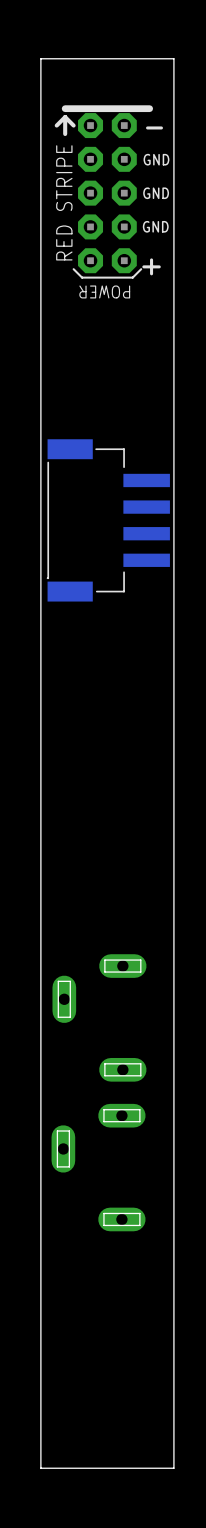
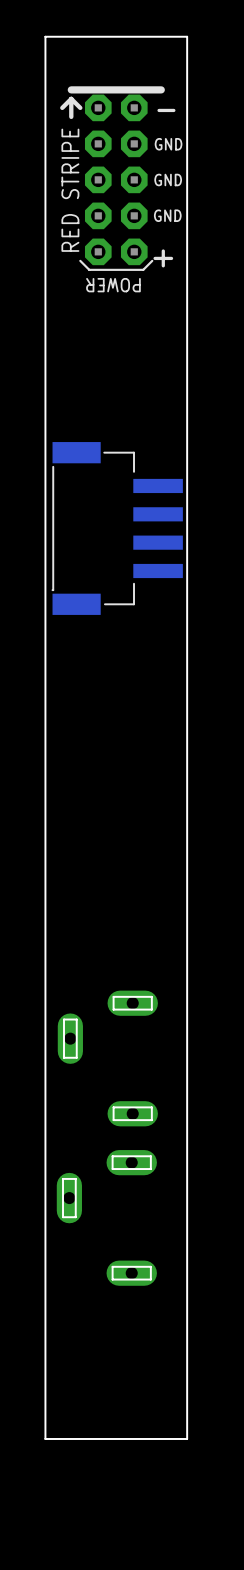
board edge: (173, 1375) (173, 1468) (40, 1468) (40, 1375) -> (187, 1438) (45, 1438)

